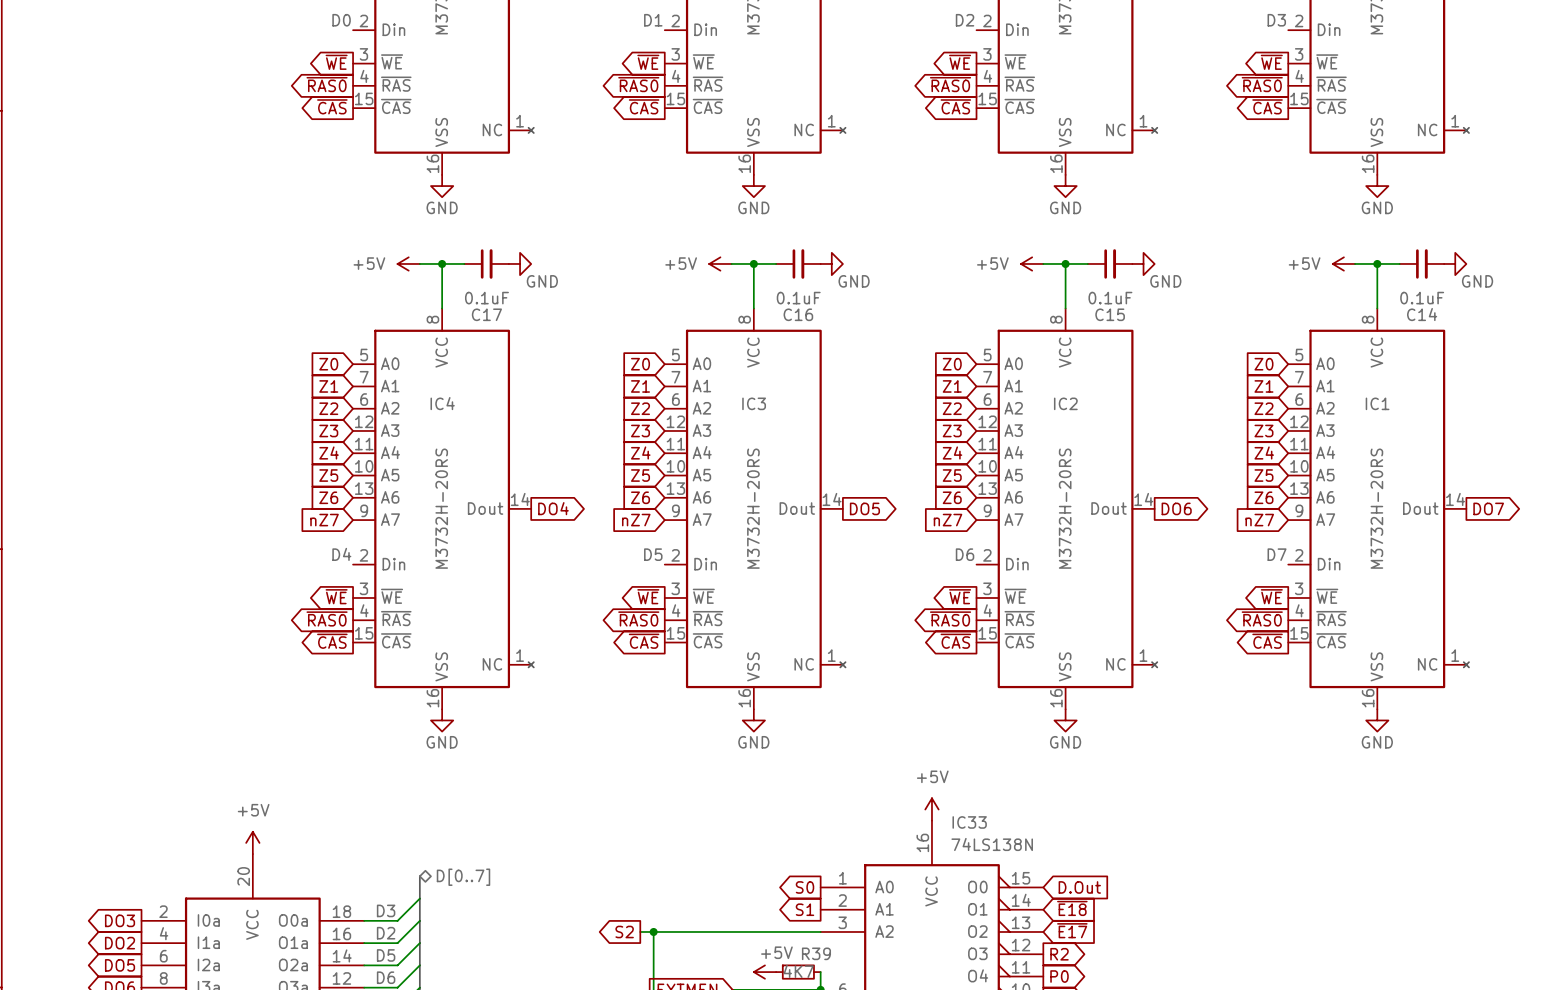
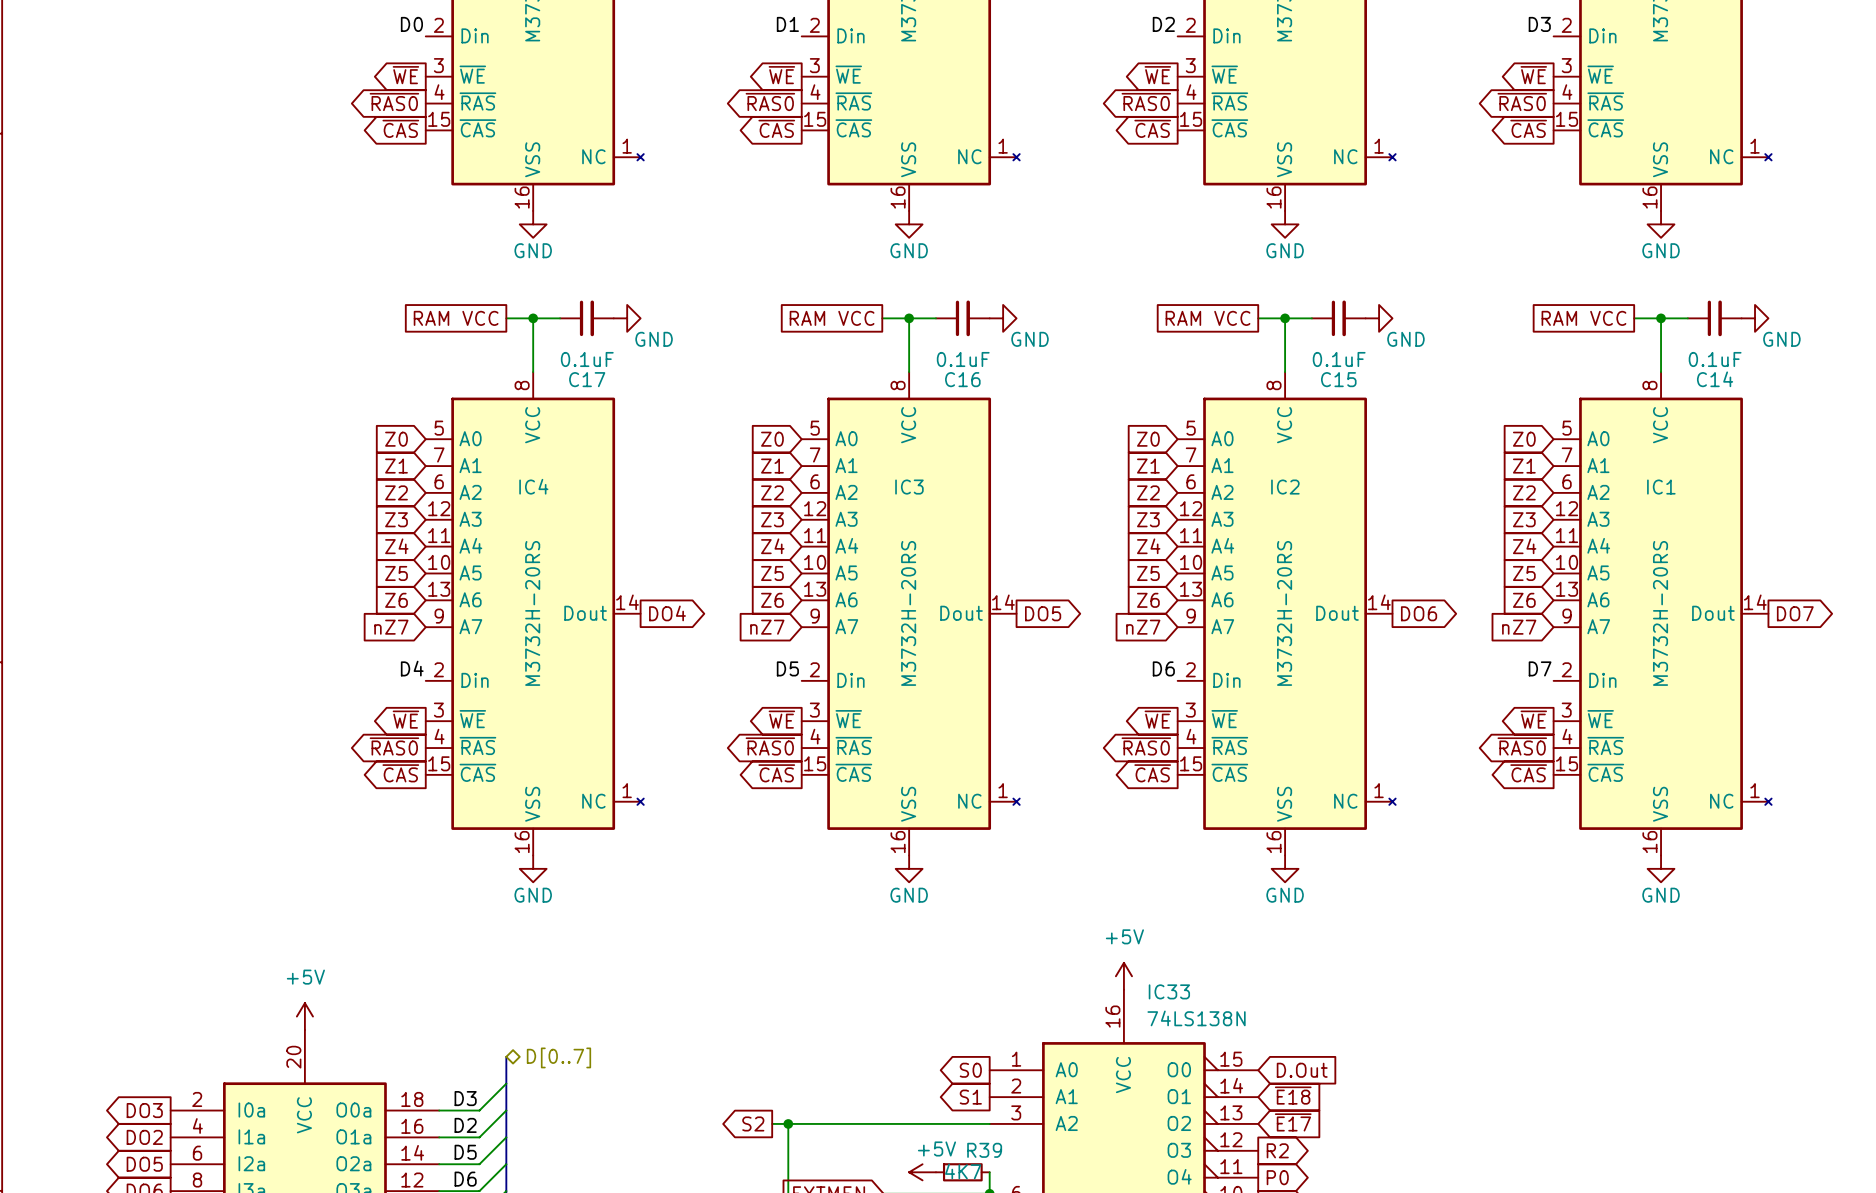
global label: none -> RAM VCC (456, 318)
power symbol: +5V (408, 263) -> none
global label: none -> RAM VCC (832, 318)
power symbol: +5V (720, 263) -> none
global label: none -> RAM VCC (1208, 318)
power symbol: +5V (1032, 263) -> none
global label: none -> RAM VCC (1583, 318)
power symbol: +5V (1343, 263) -> none

